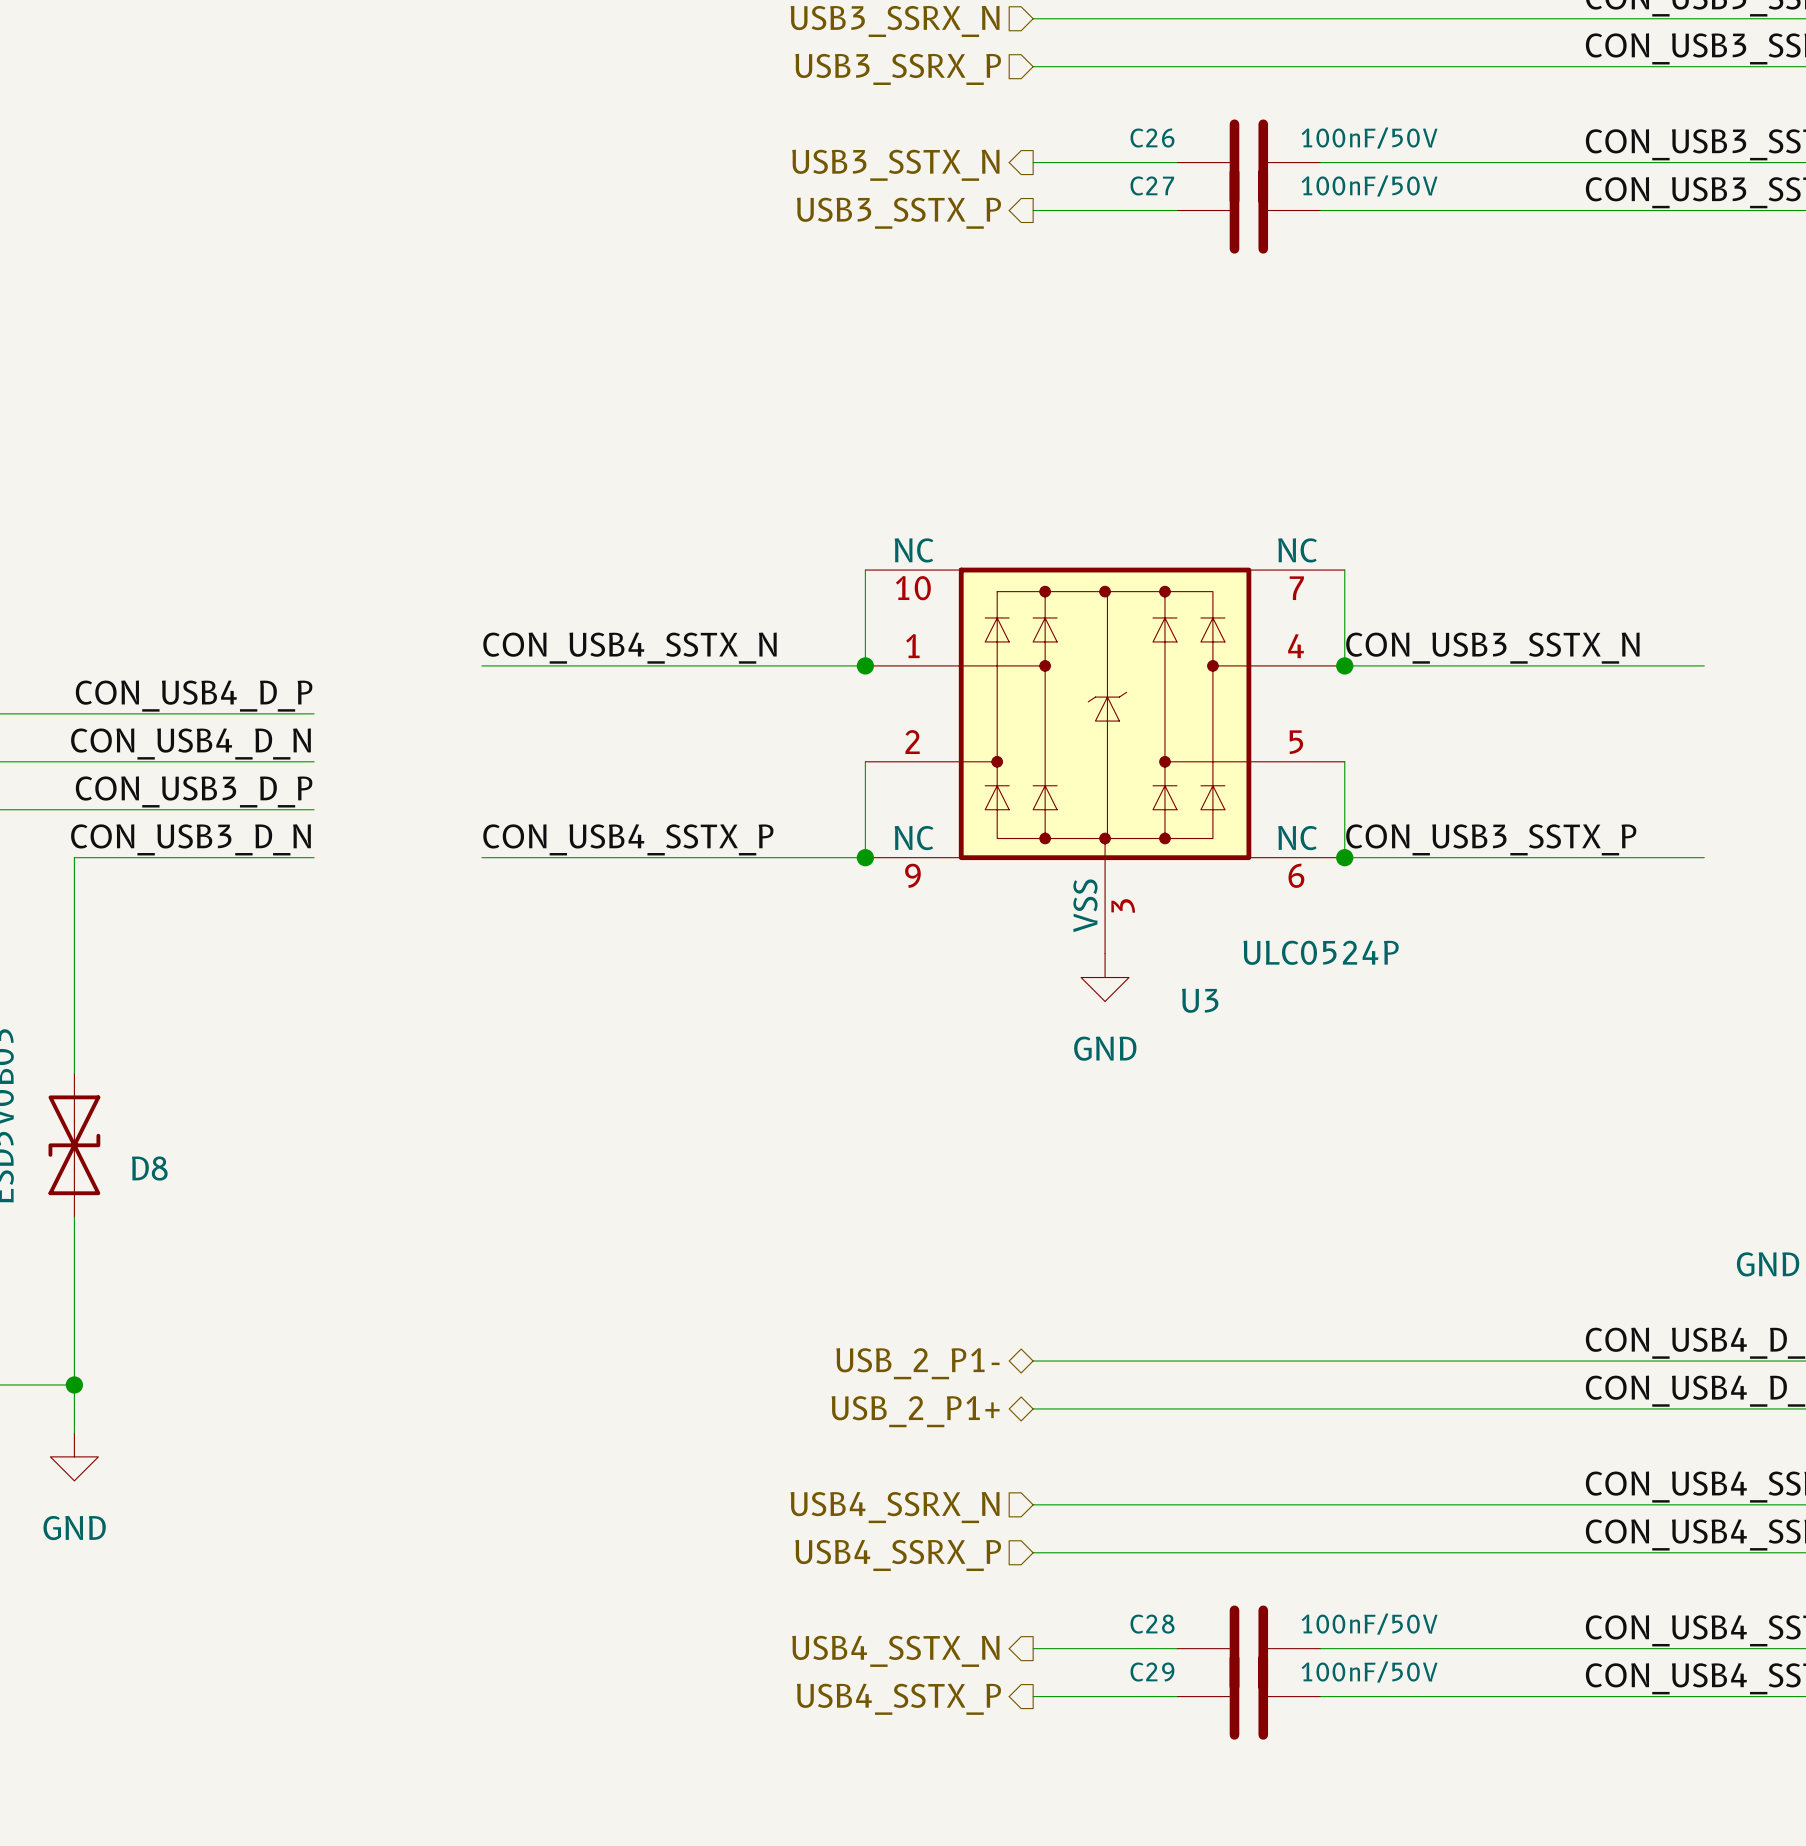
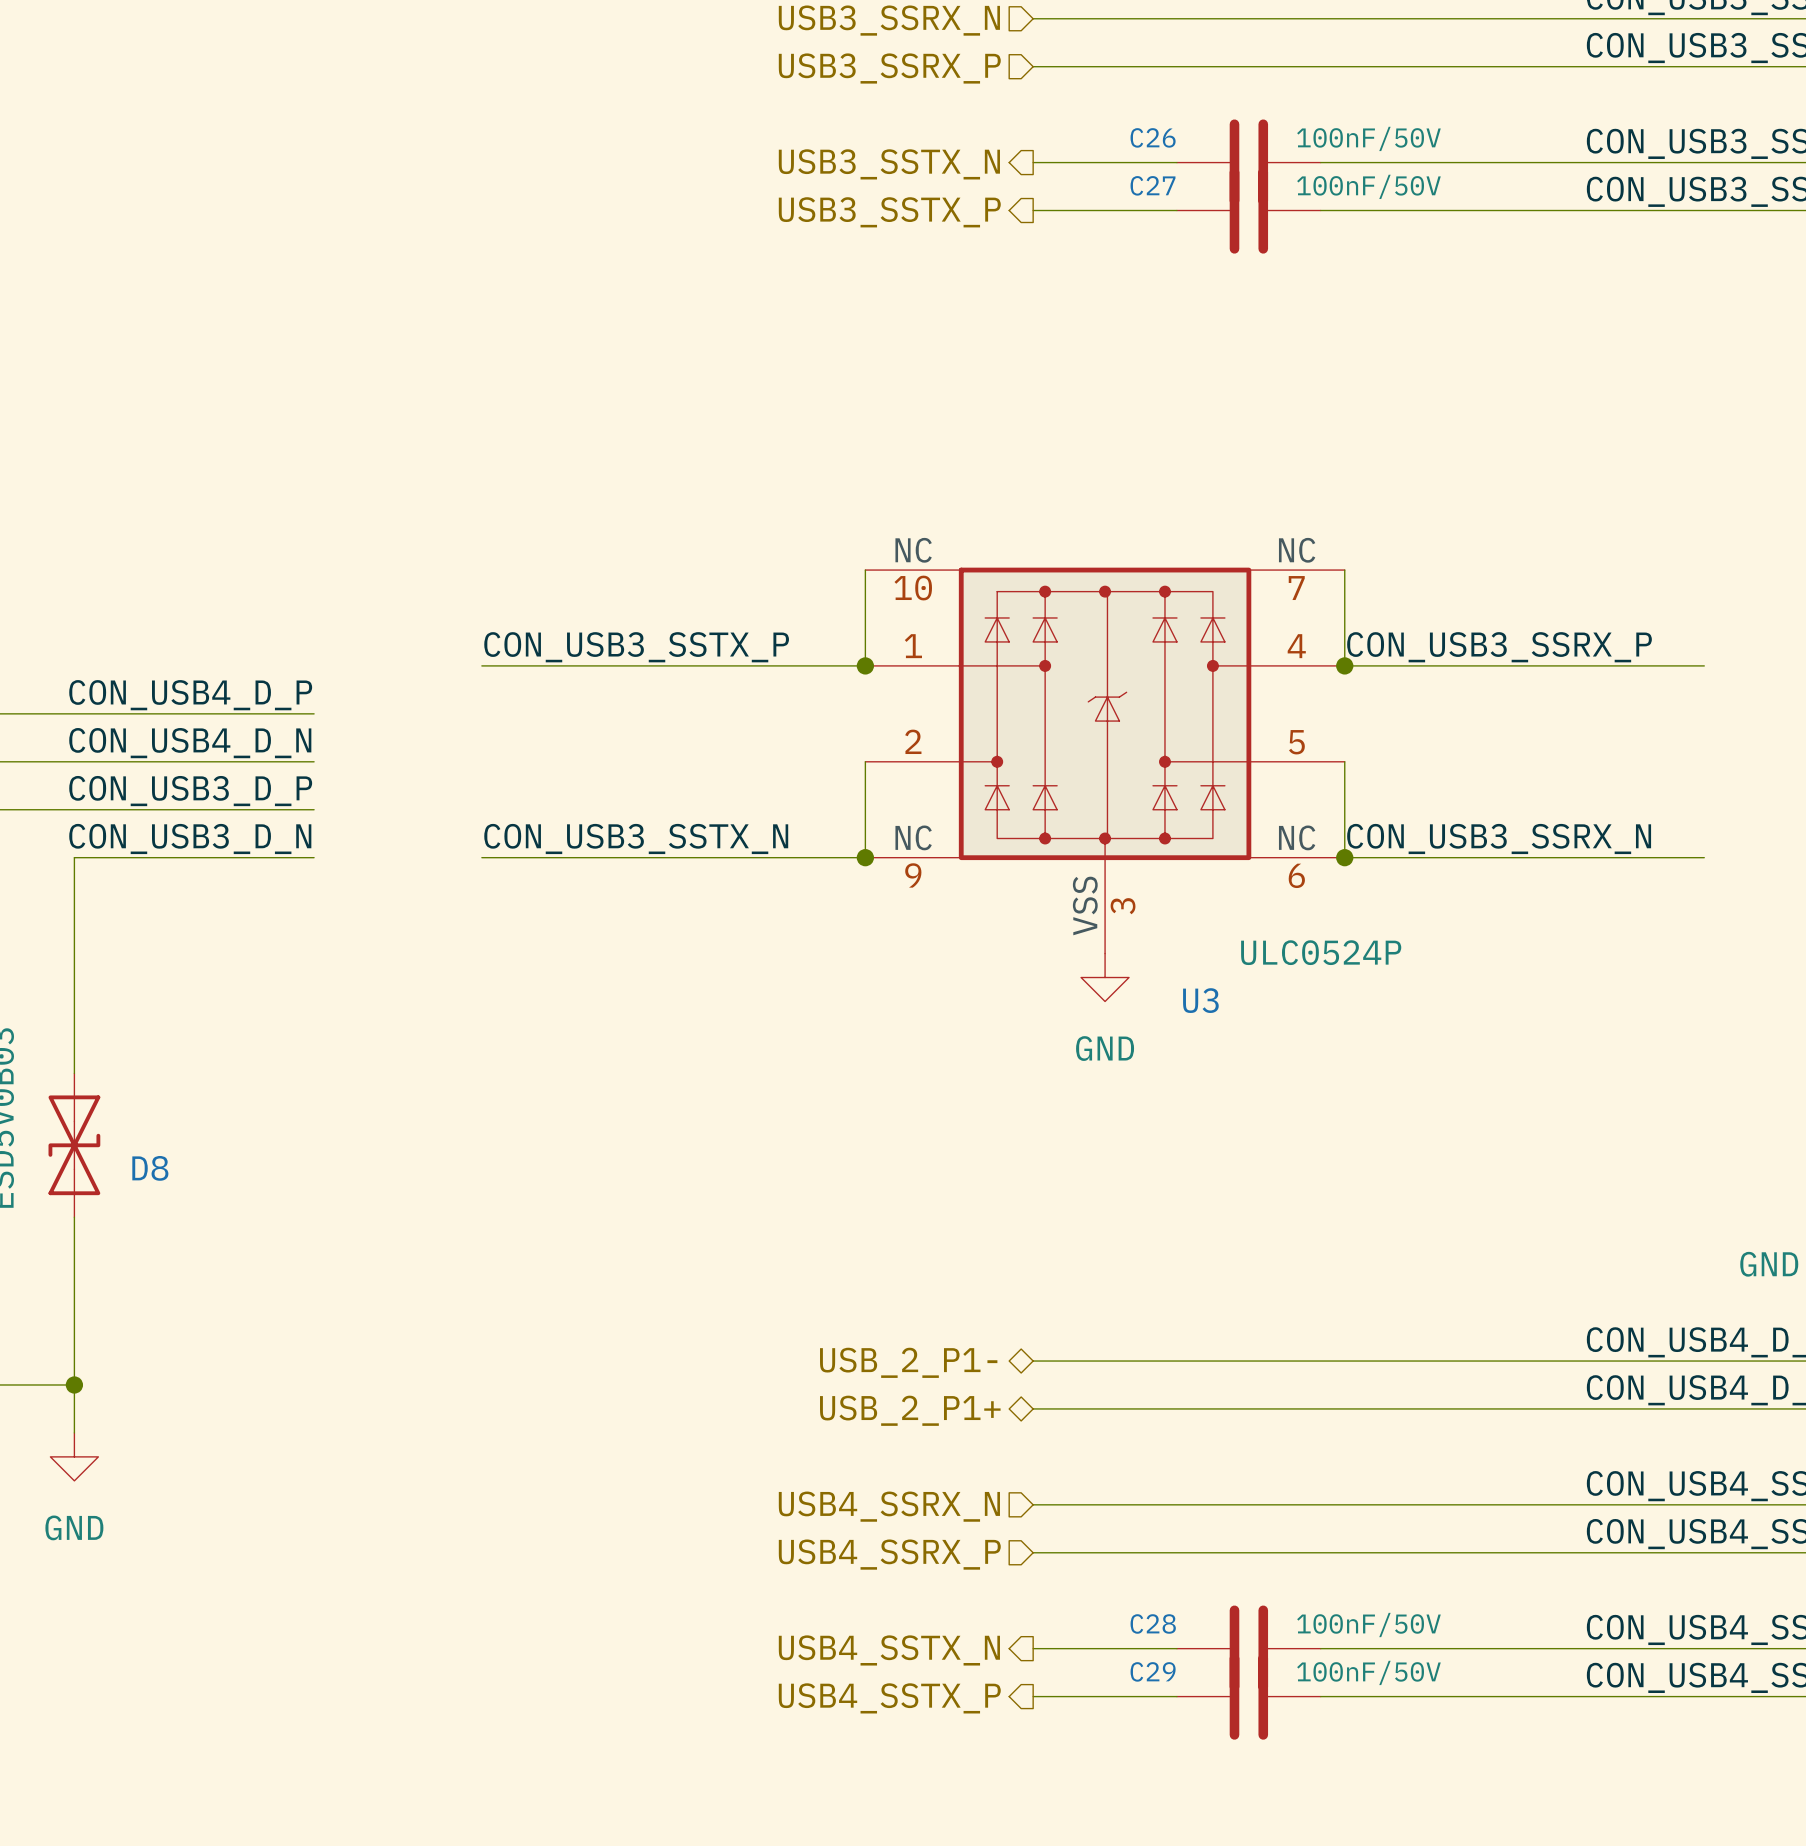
label: CON_USB4_SSTX_N (629, 648) -> CON_USB3_SSTX_P (636, 647)
label: CON_USB3_SSTX_N (1492, 648) -> CON_USB3_SSRX_P (1499, 647)
label: CON_USB4_SSTX_P (628, 839) -> CON_USB3_SSTX_N (636, 838)
label: CON_USB3_SSTX_P (1491, 839) -> CON_USB3_SSRX_N (1499, 838)

